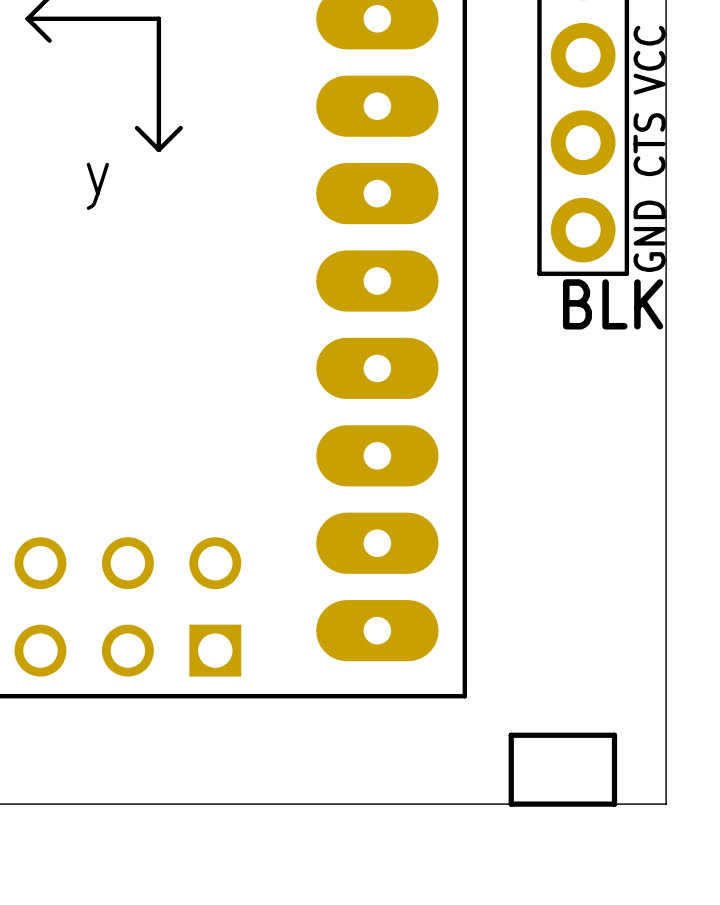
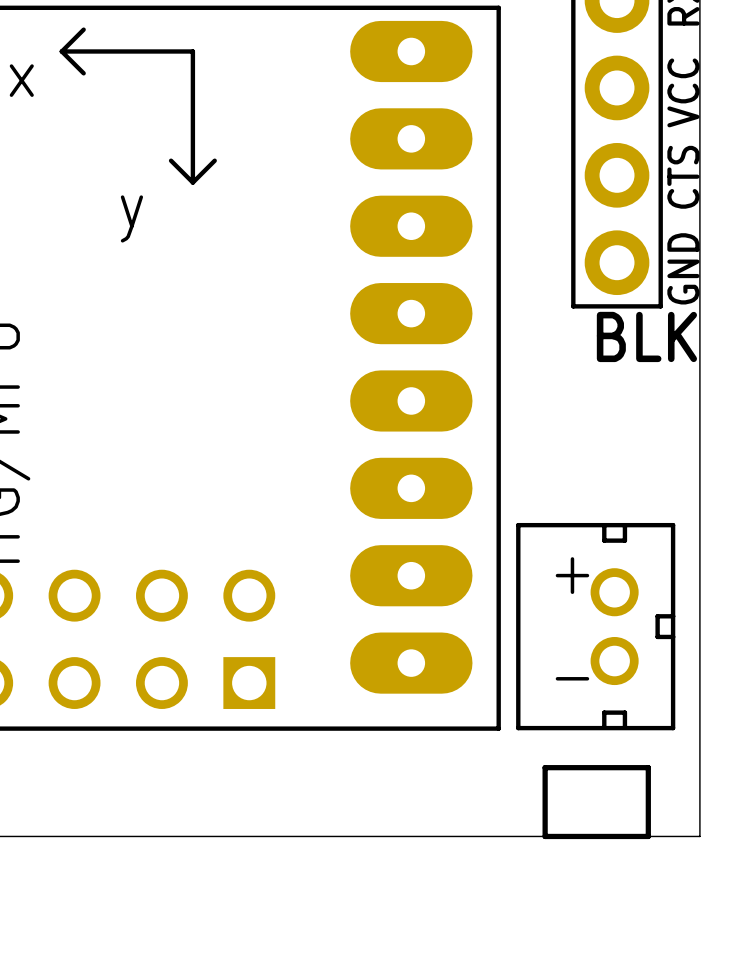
part: none -> (595, 626)

